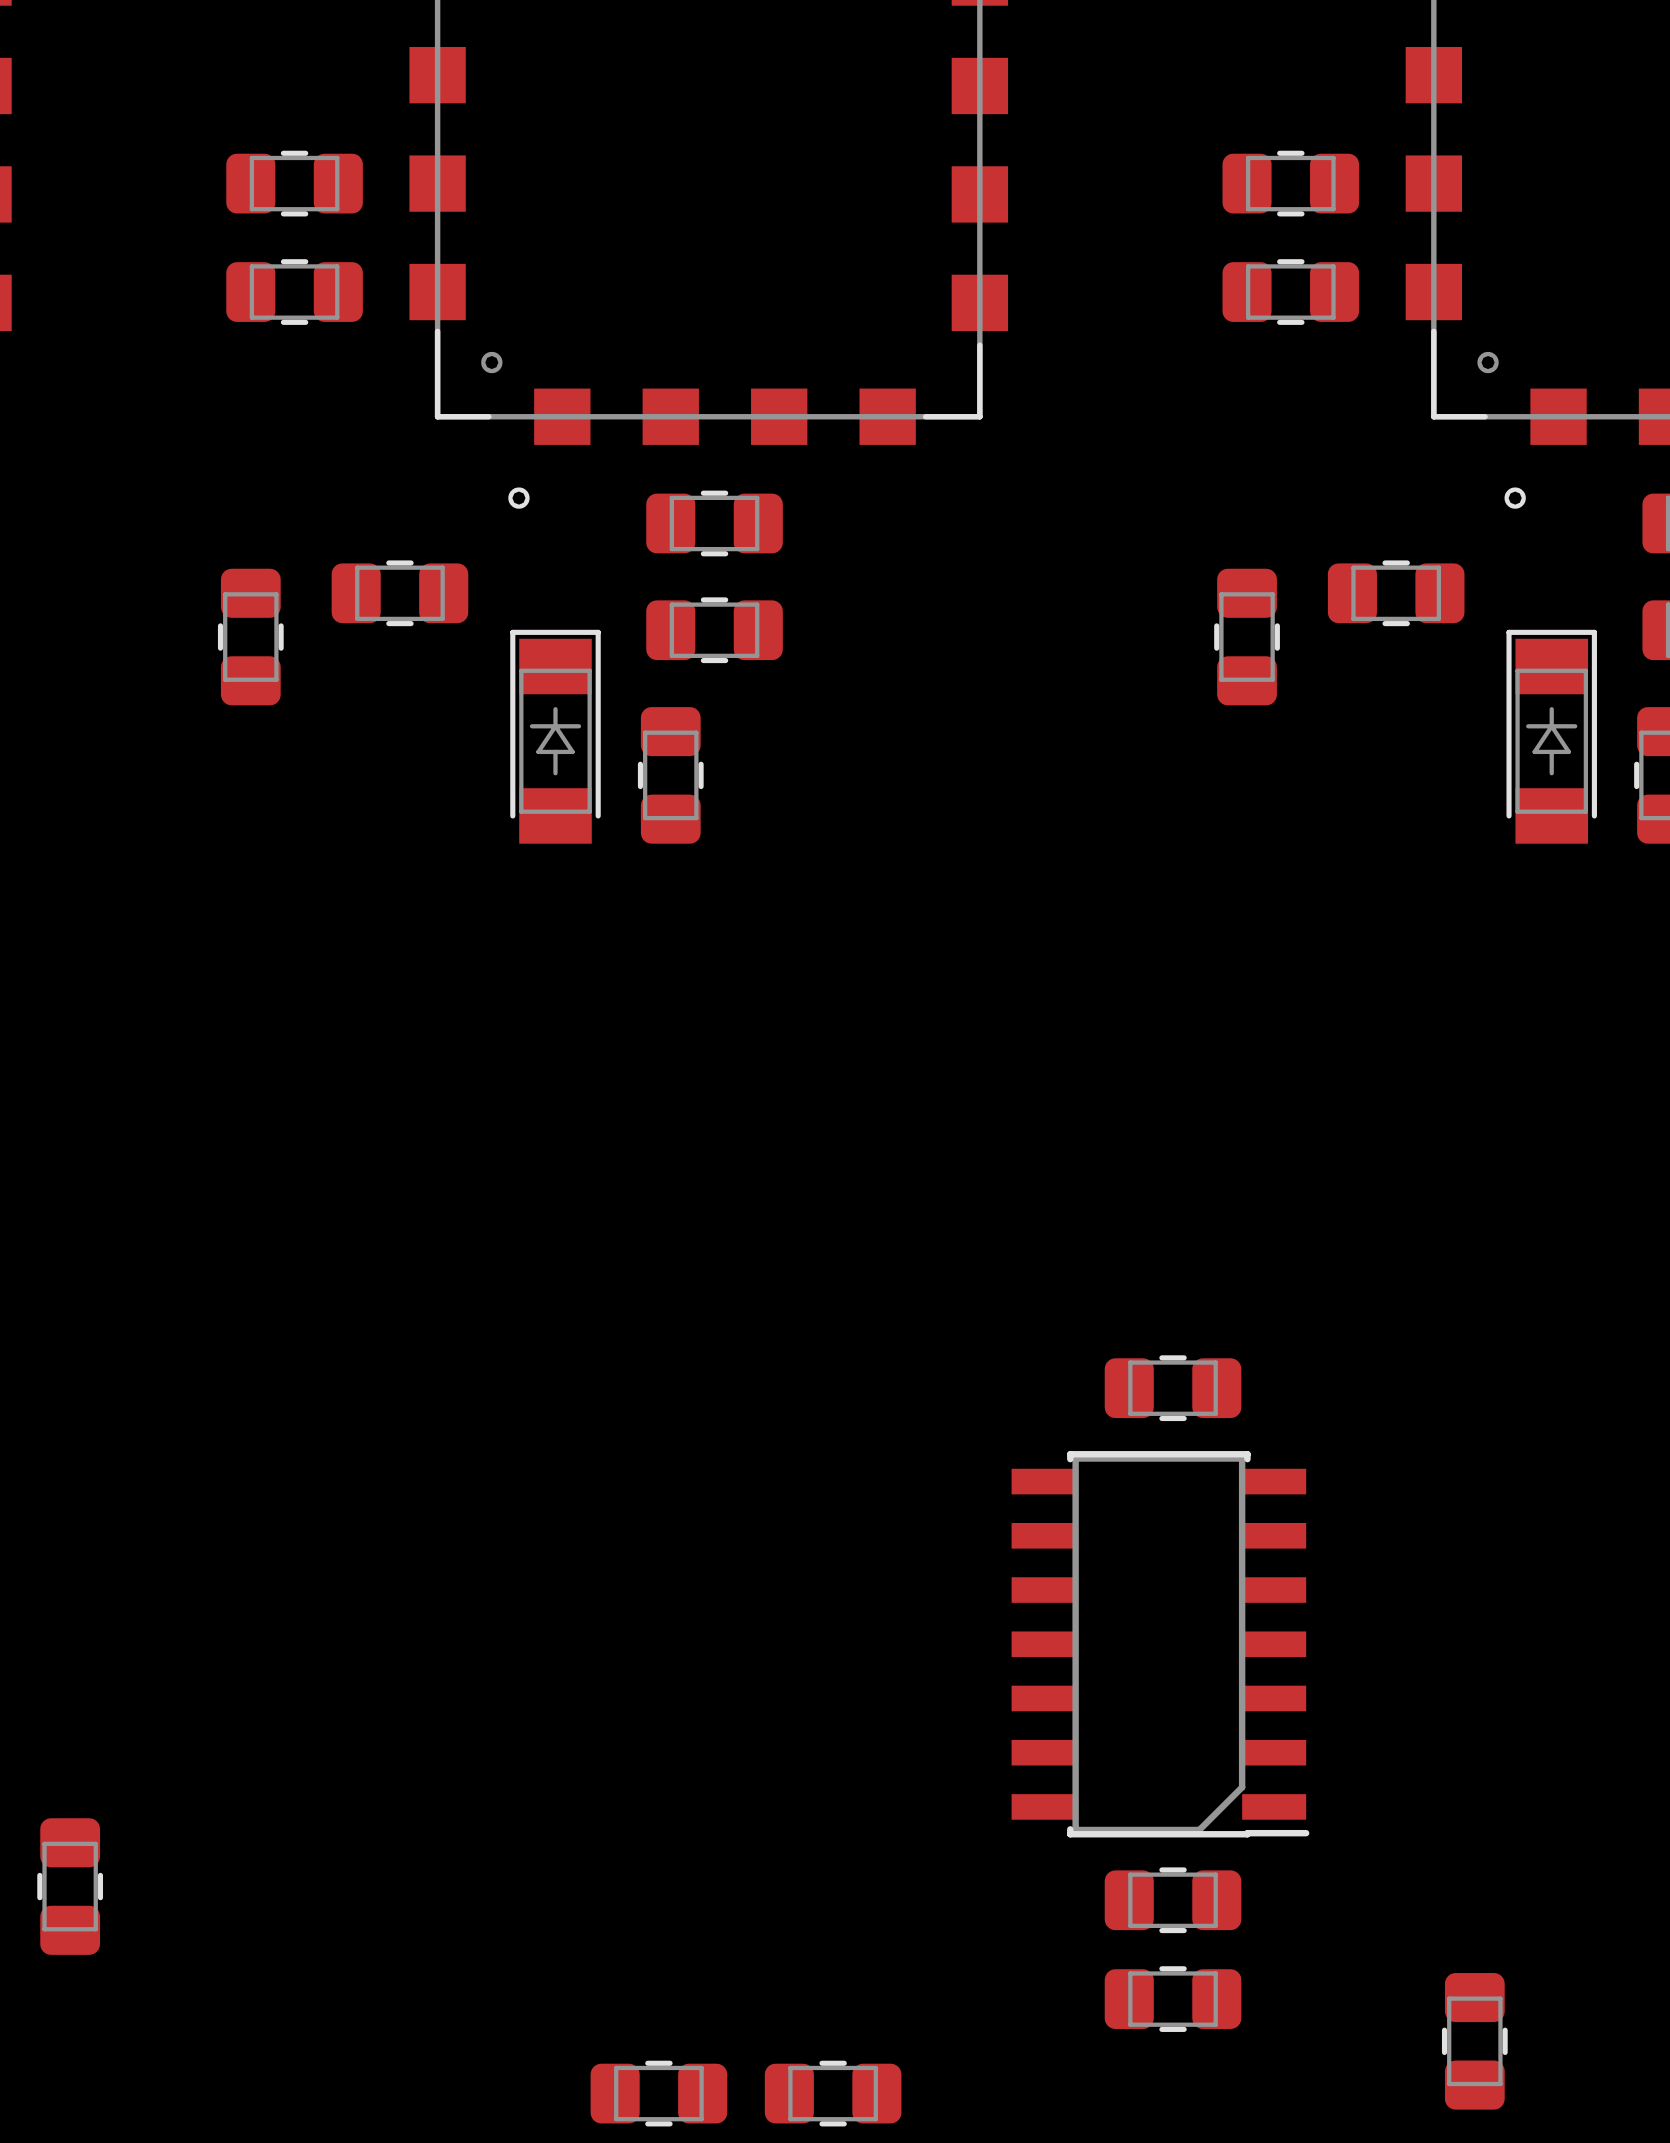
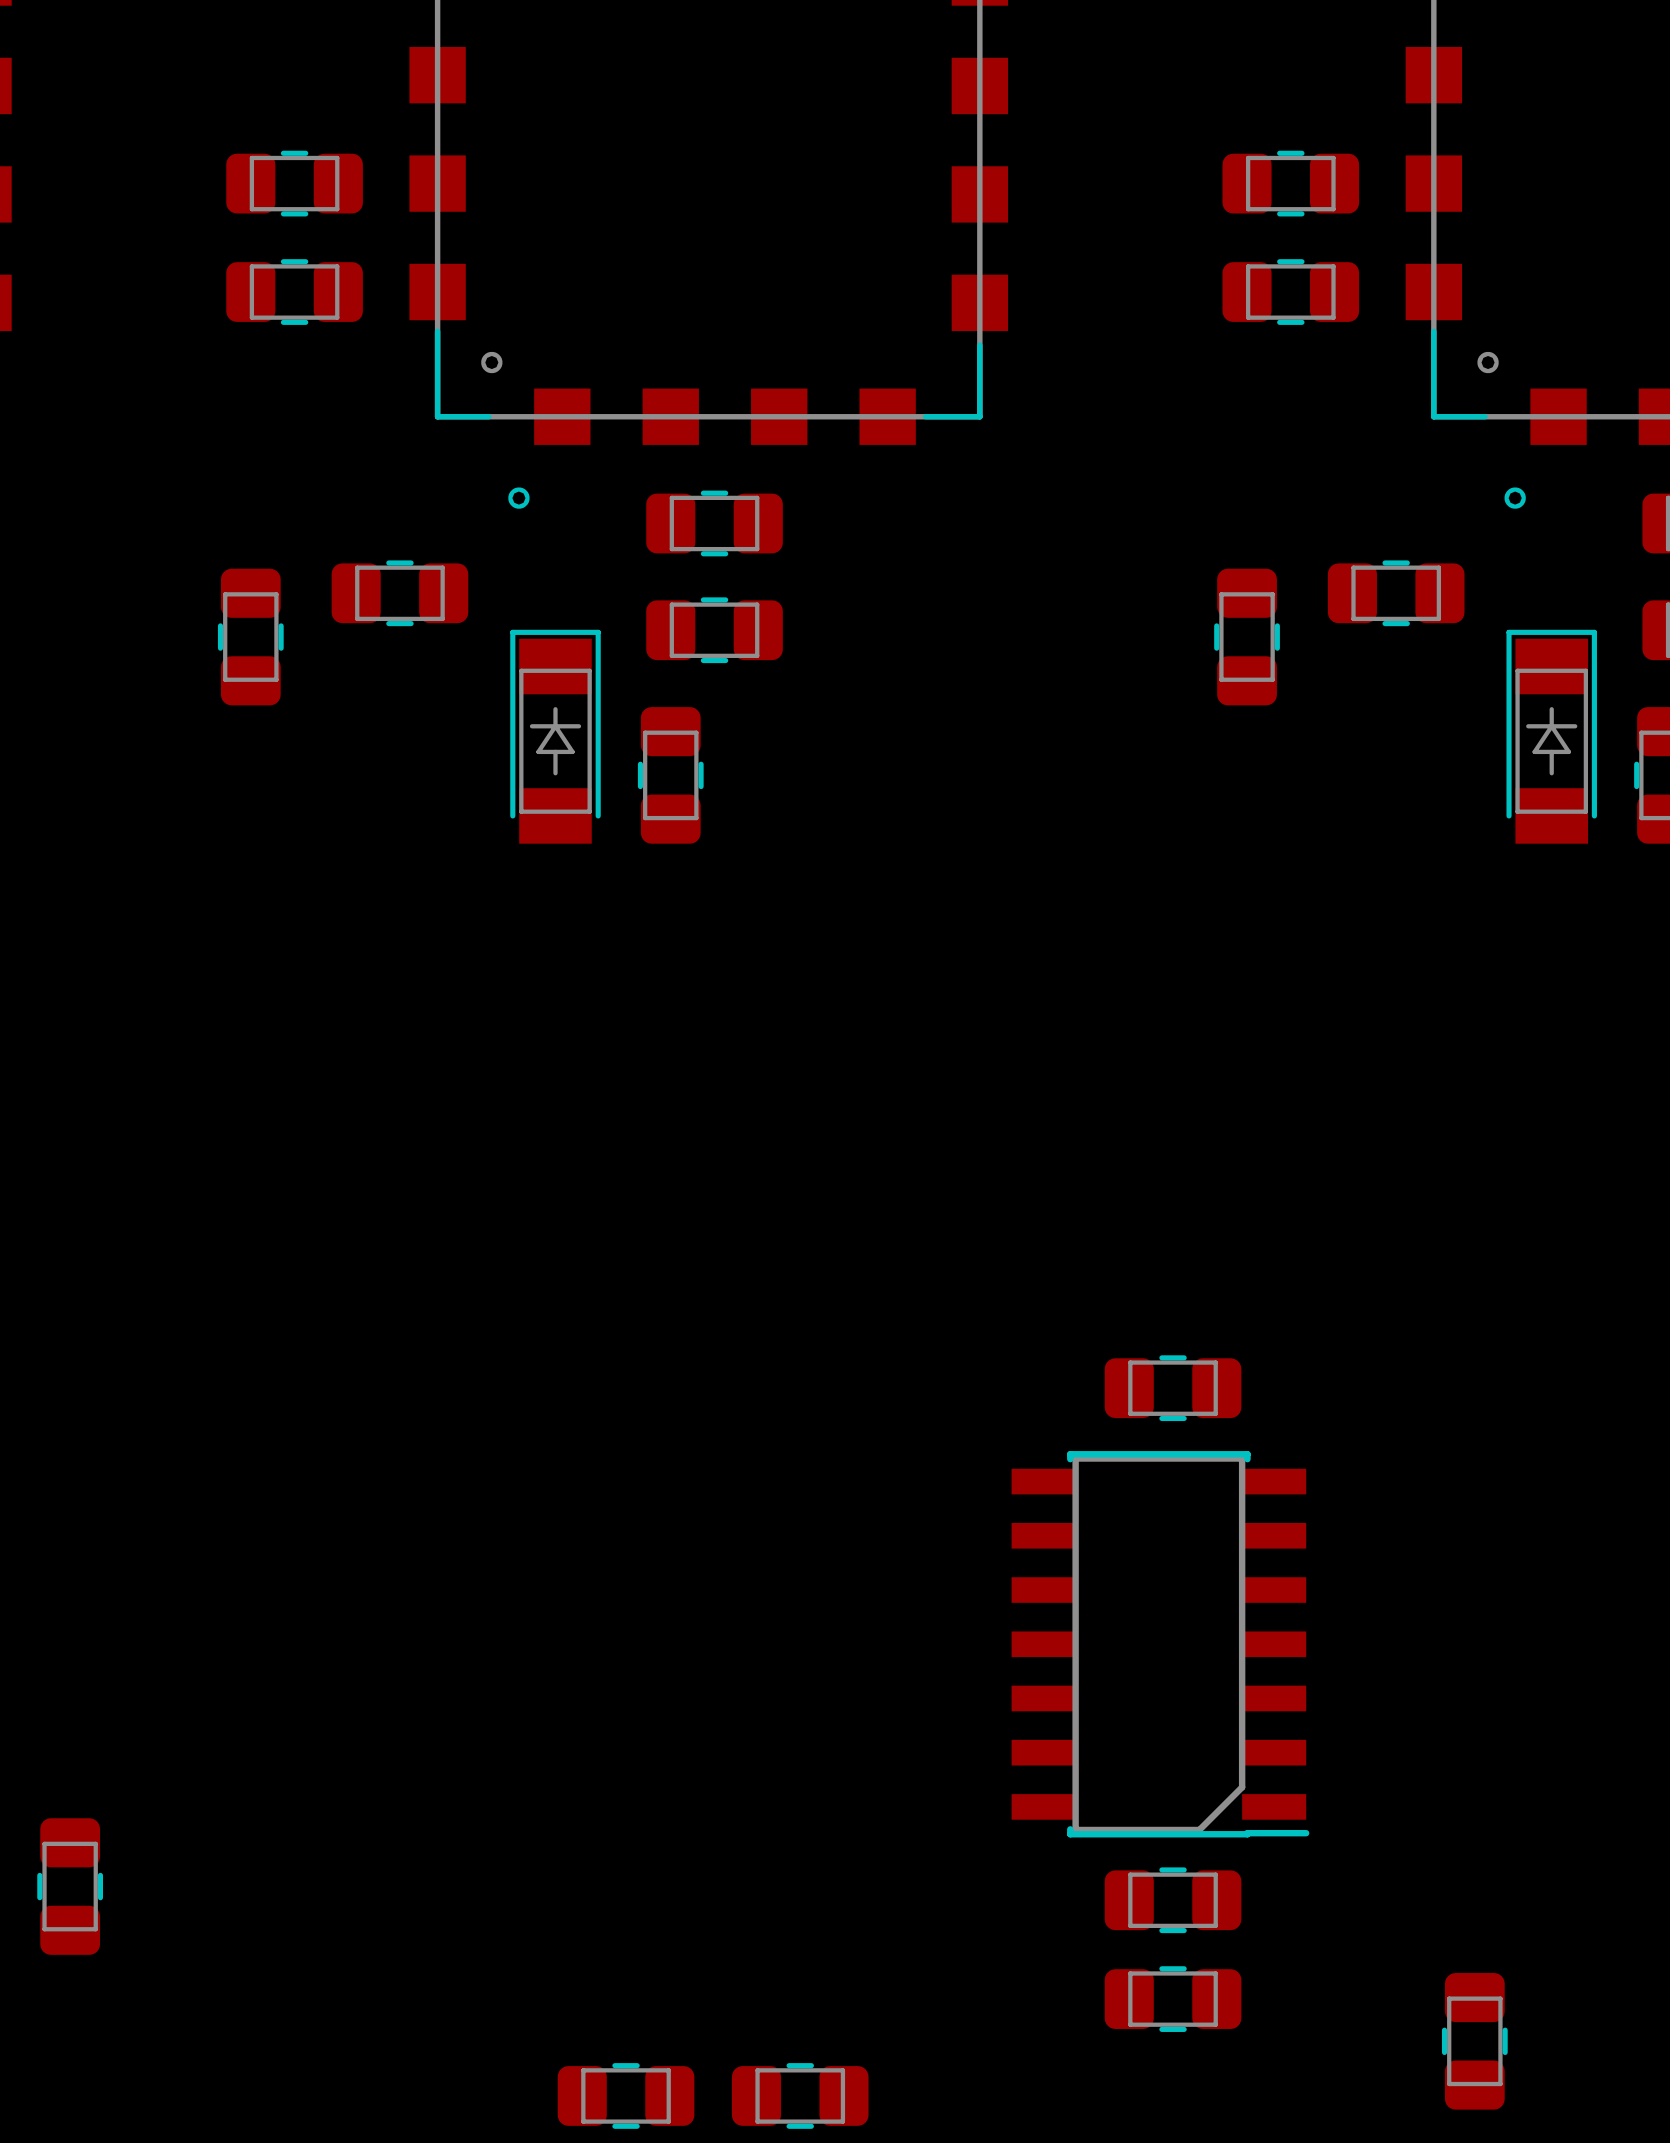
part position: (658, 2093) -> (626, 2095)
part position: (833, 2093) -> (800, 2095)

